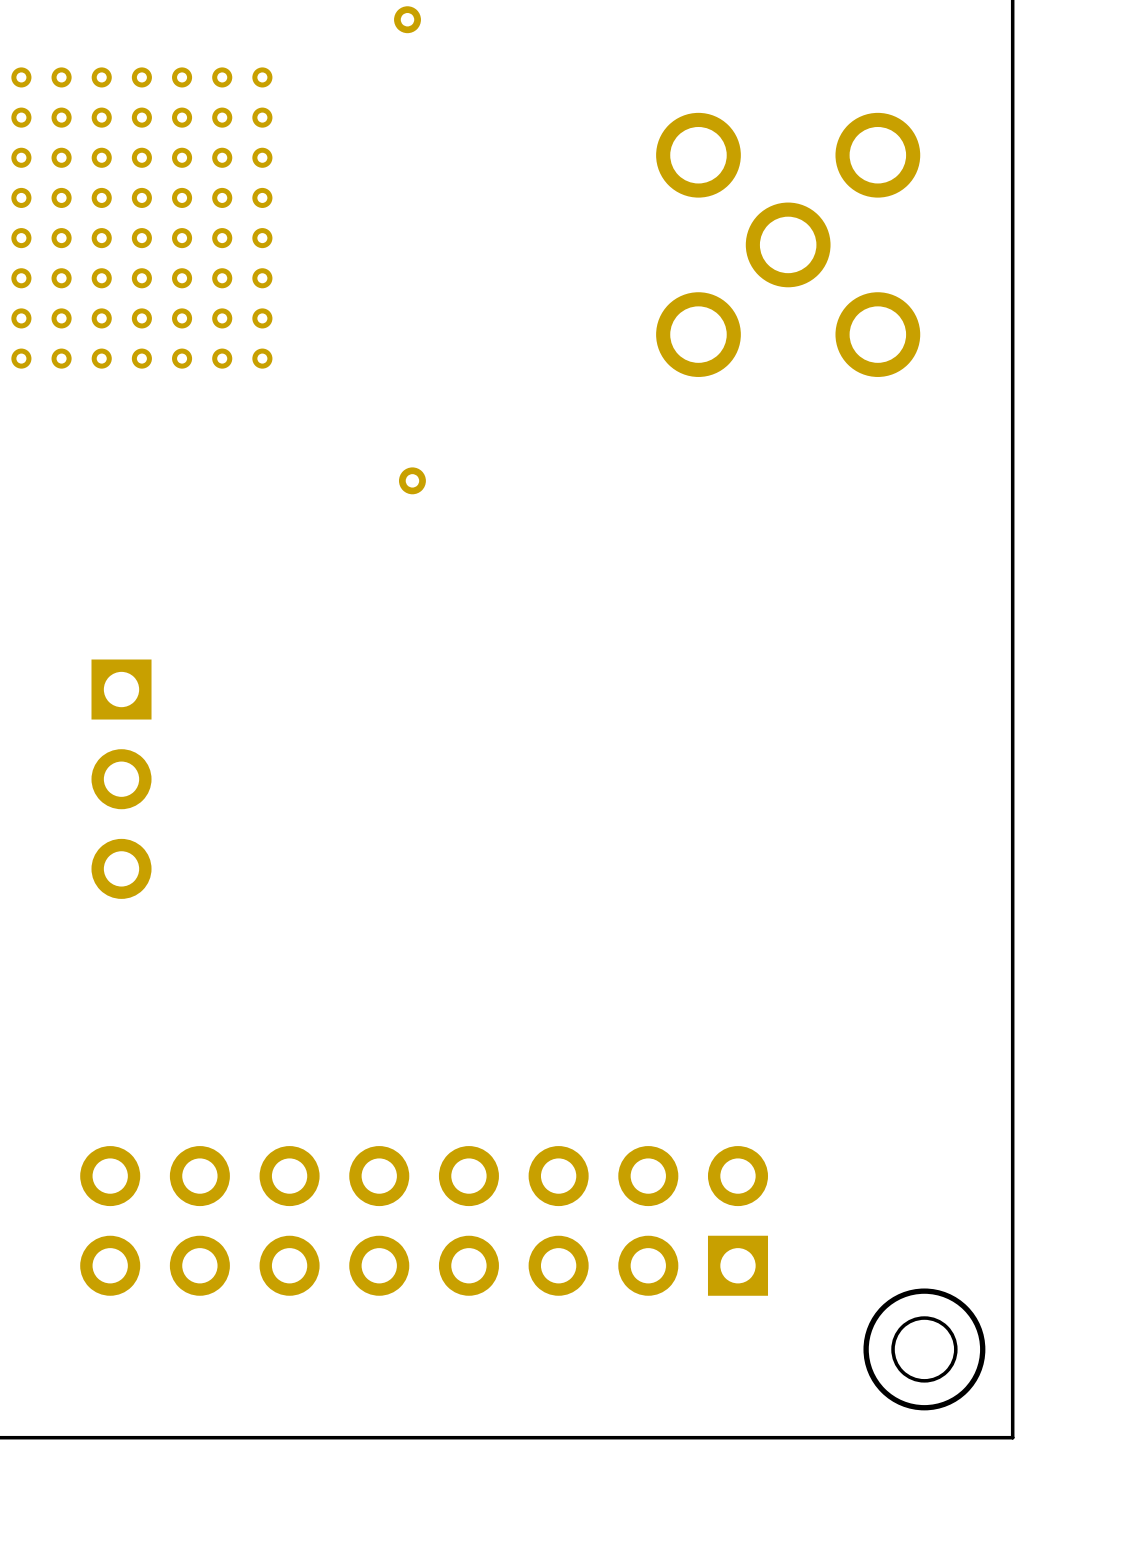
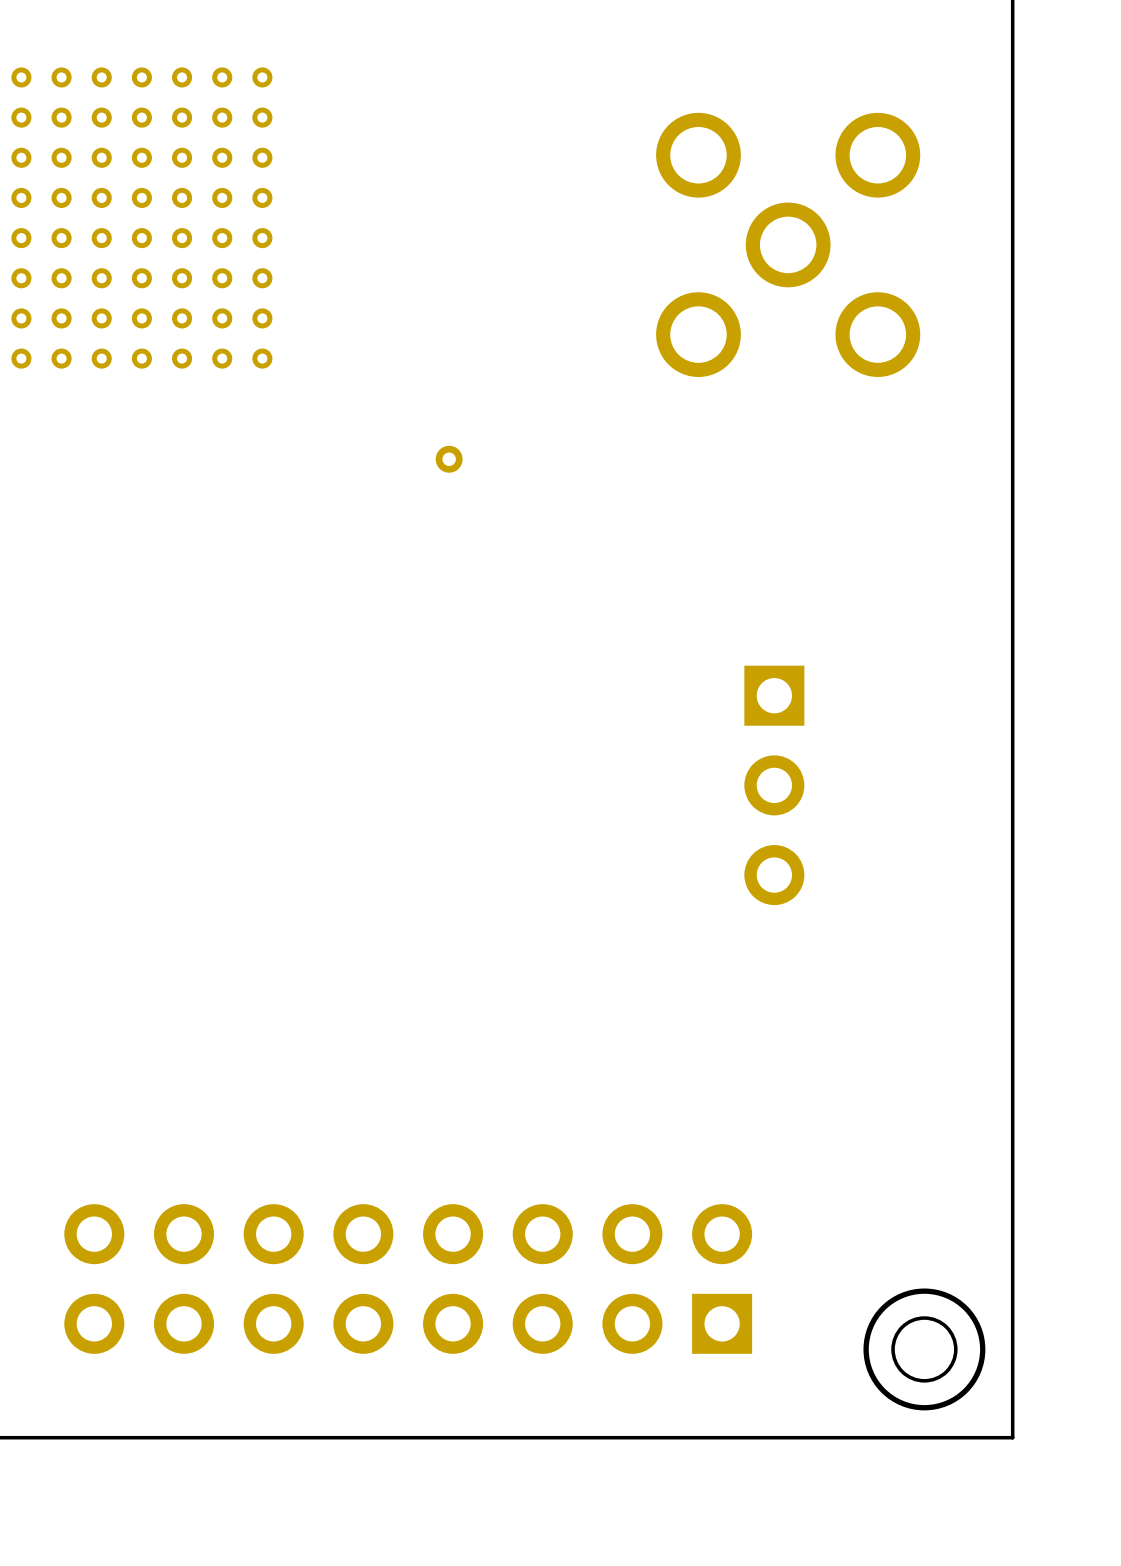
part: (407, 19) -> none
part position: (412, 480) -> (449, 459)
part position: (121, 779) -> (774, 785)
part position: (424, 1220) -> (408, 1278)

